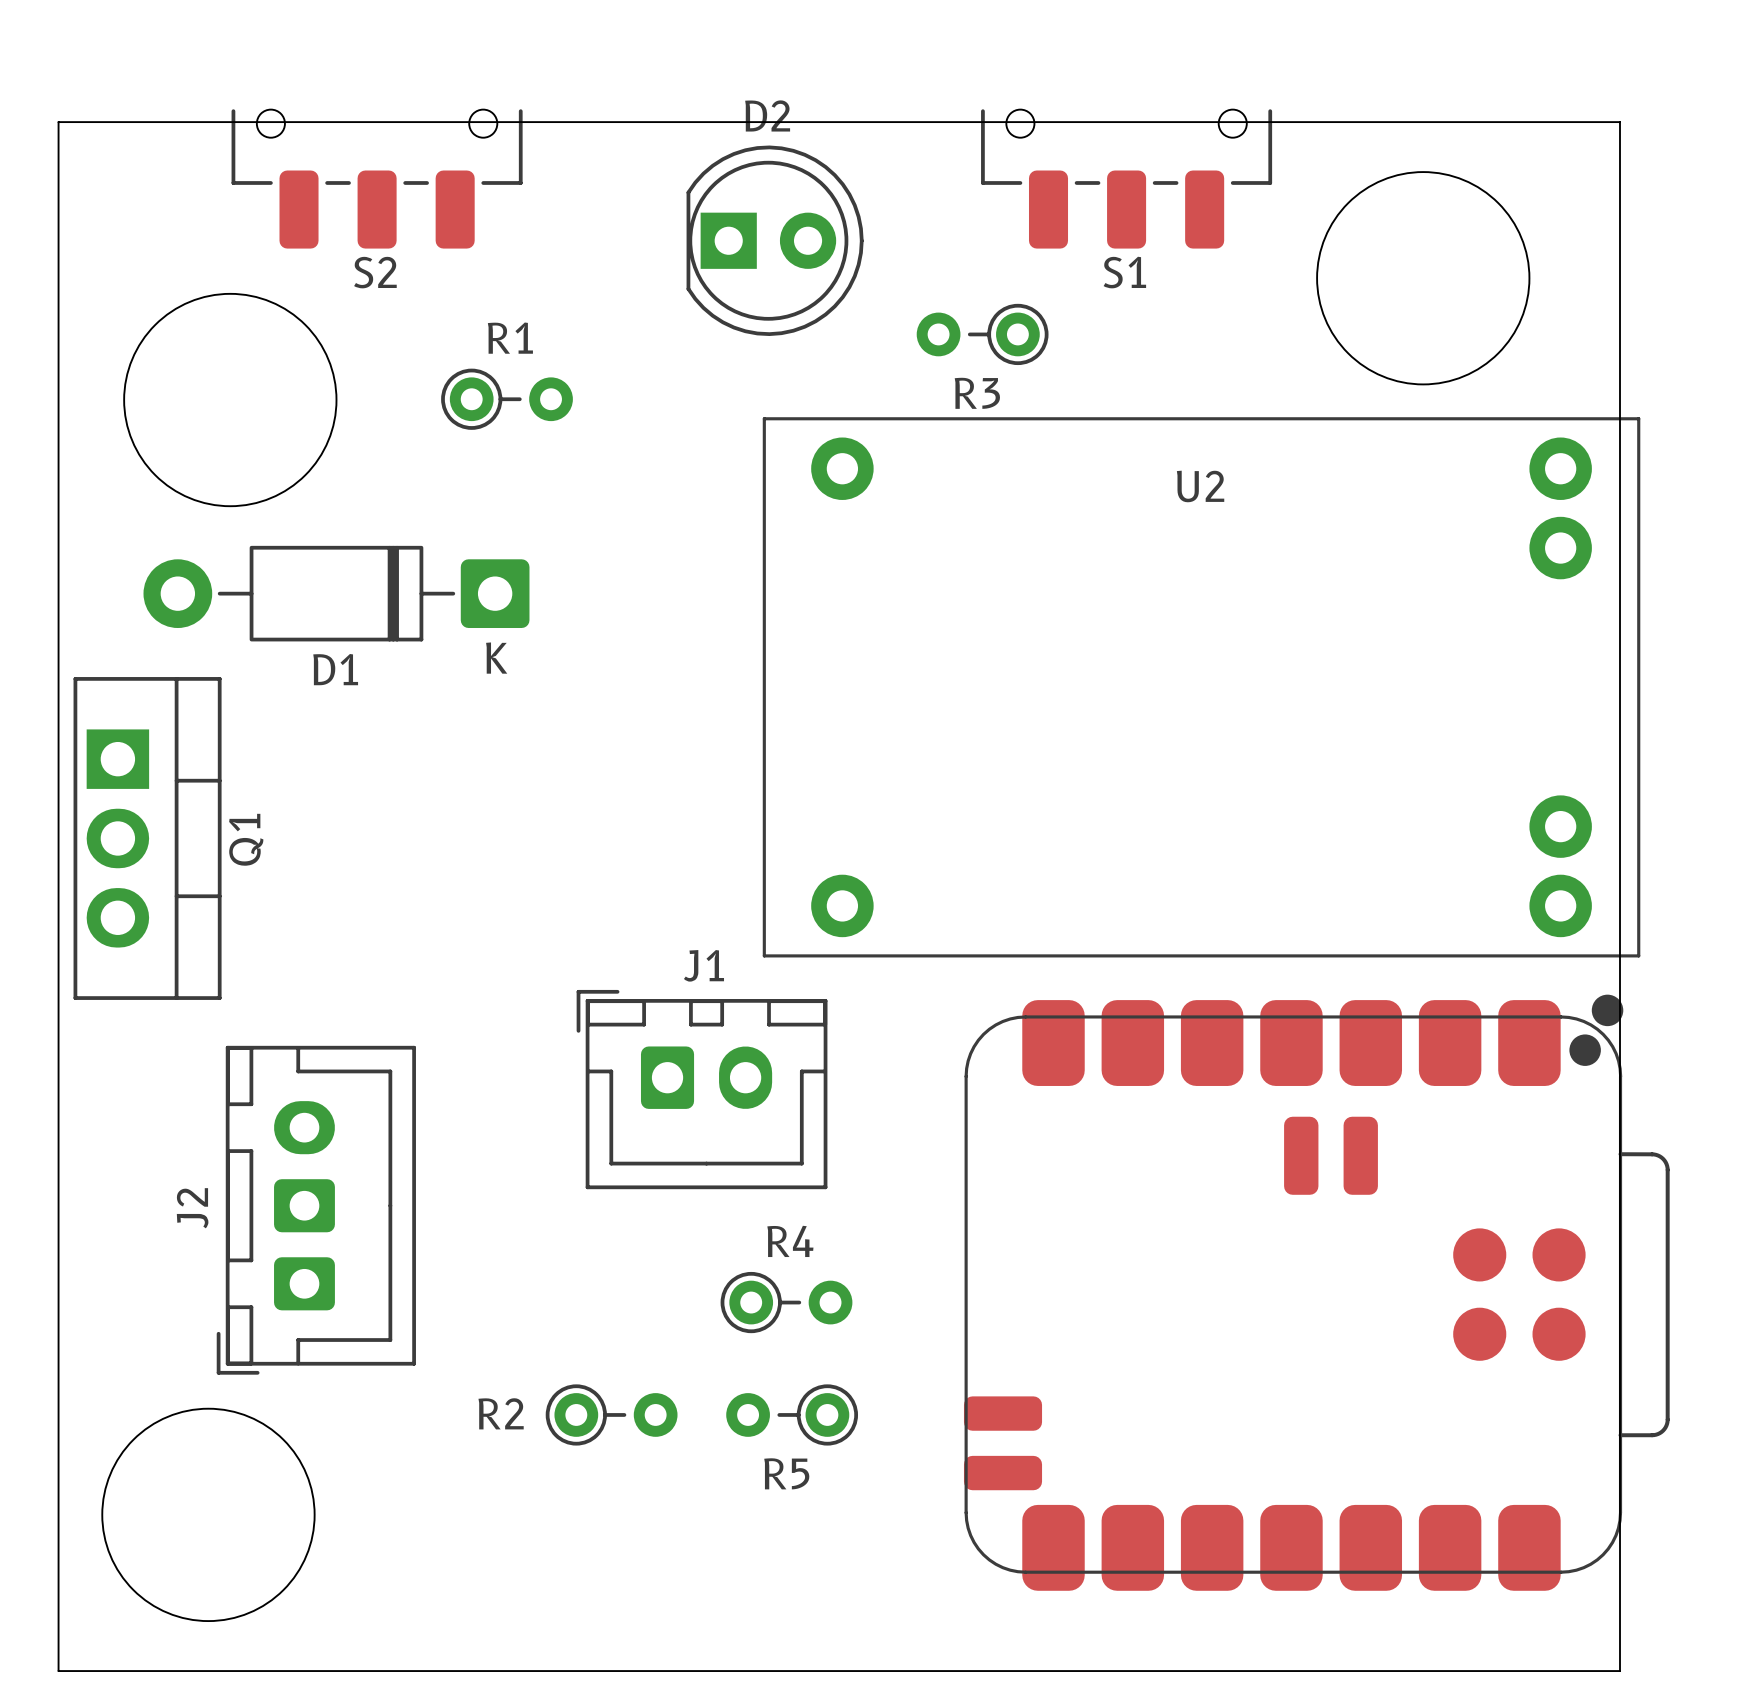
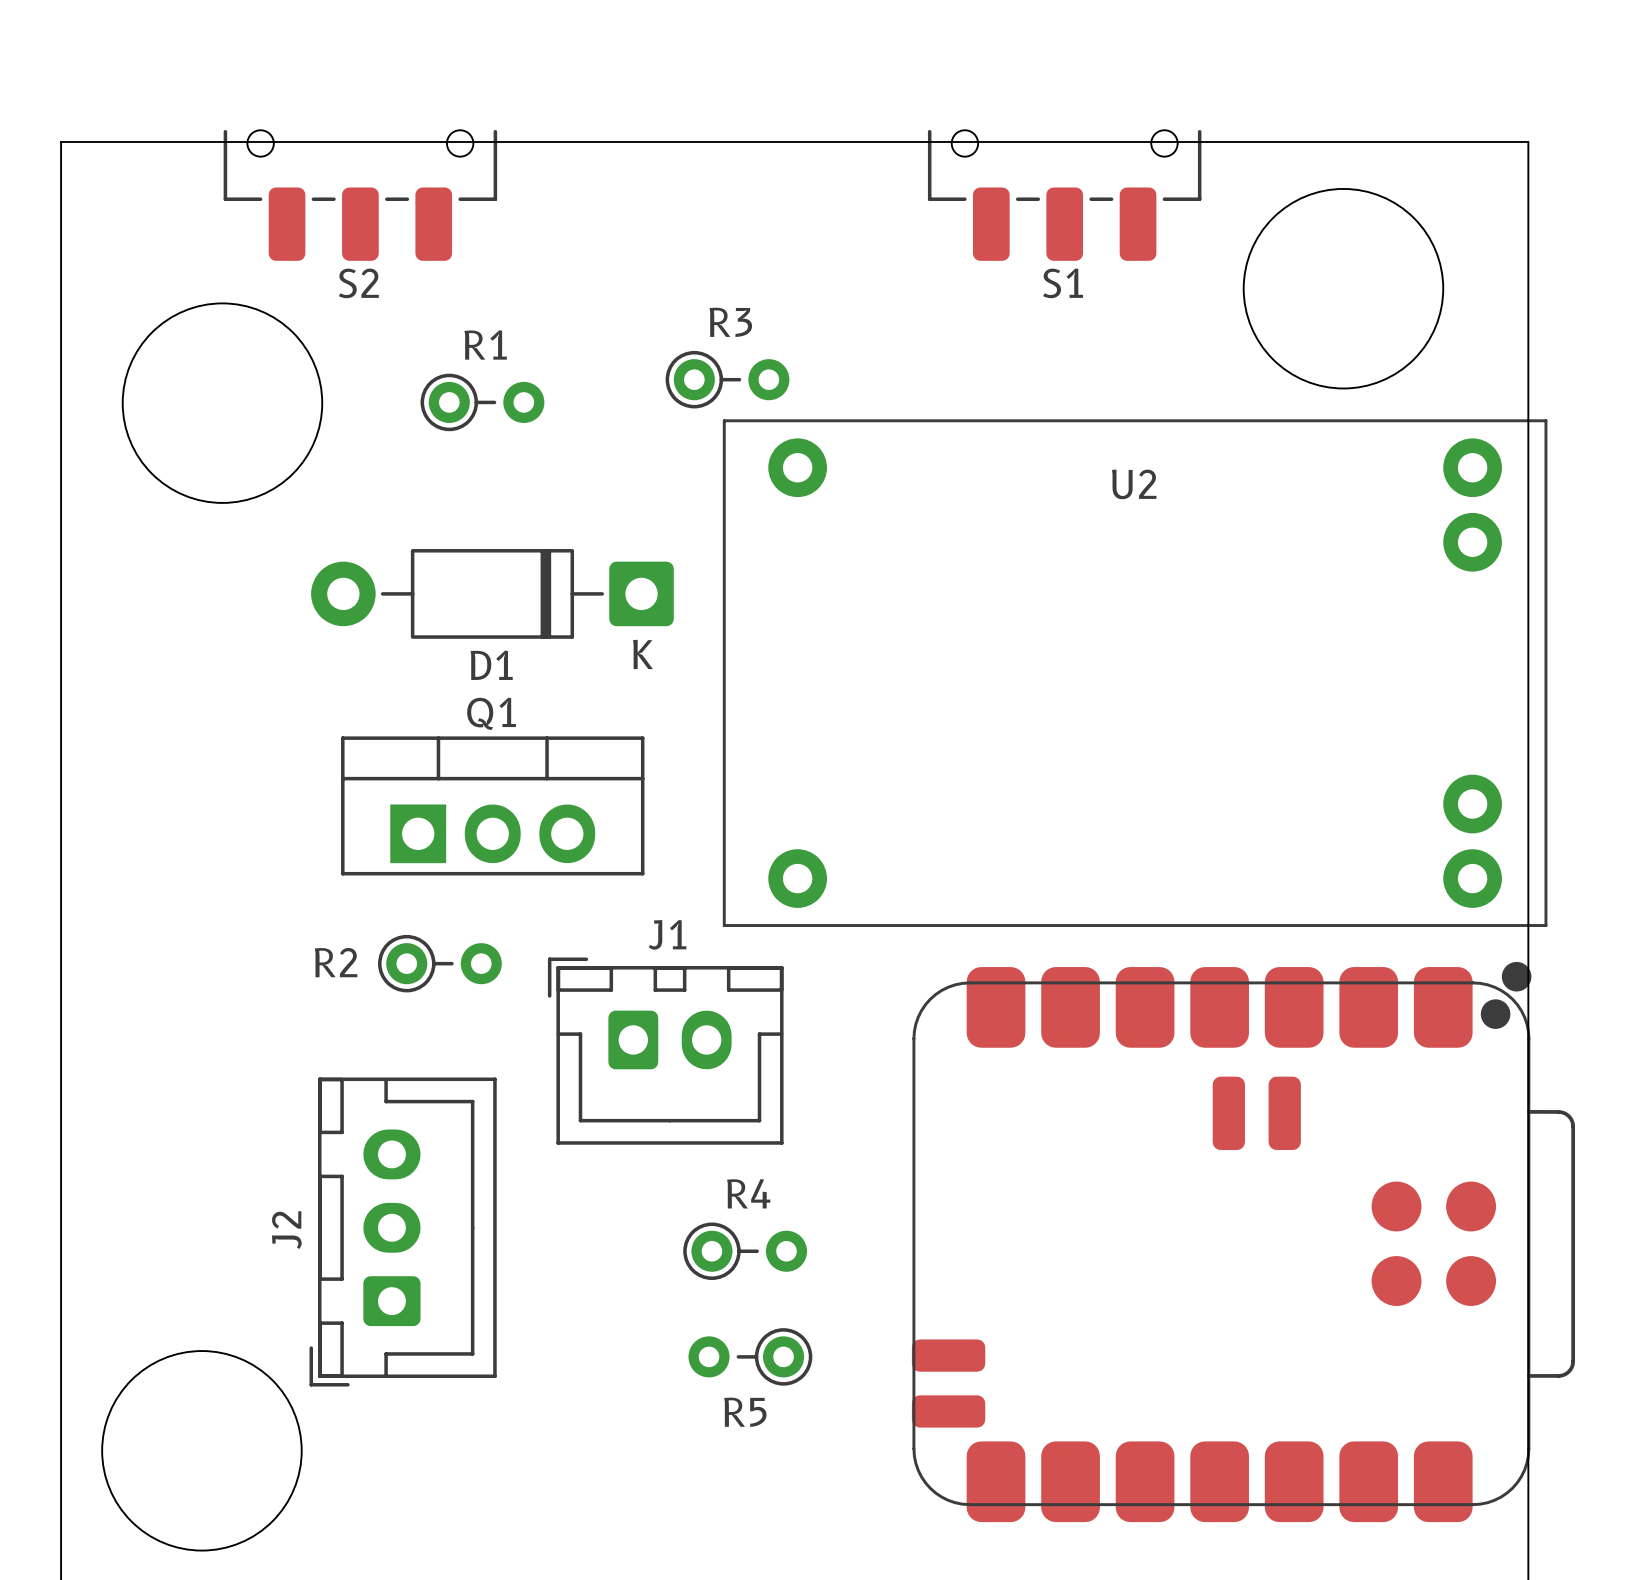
D2: (775, 240) -> none
R3 rotation: 0° (982, 334) -> 180° (727, 379)
R3 position: (982, 334) -> (727, 379)
D1 position: (336, 593) -> (492, 593)
Q1 rotation: 0° (147, 838) -> 90° counterclockwise (492, 805)
Q1 position: (147, 838) -> (492, 805)
J2 footprint: [216, 1045, 416, 1375] -> [309, 1077, 497, 1387]
R2 position: (611, 1414) -> (439, 963)

